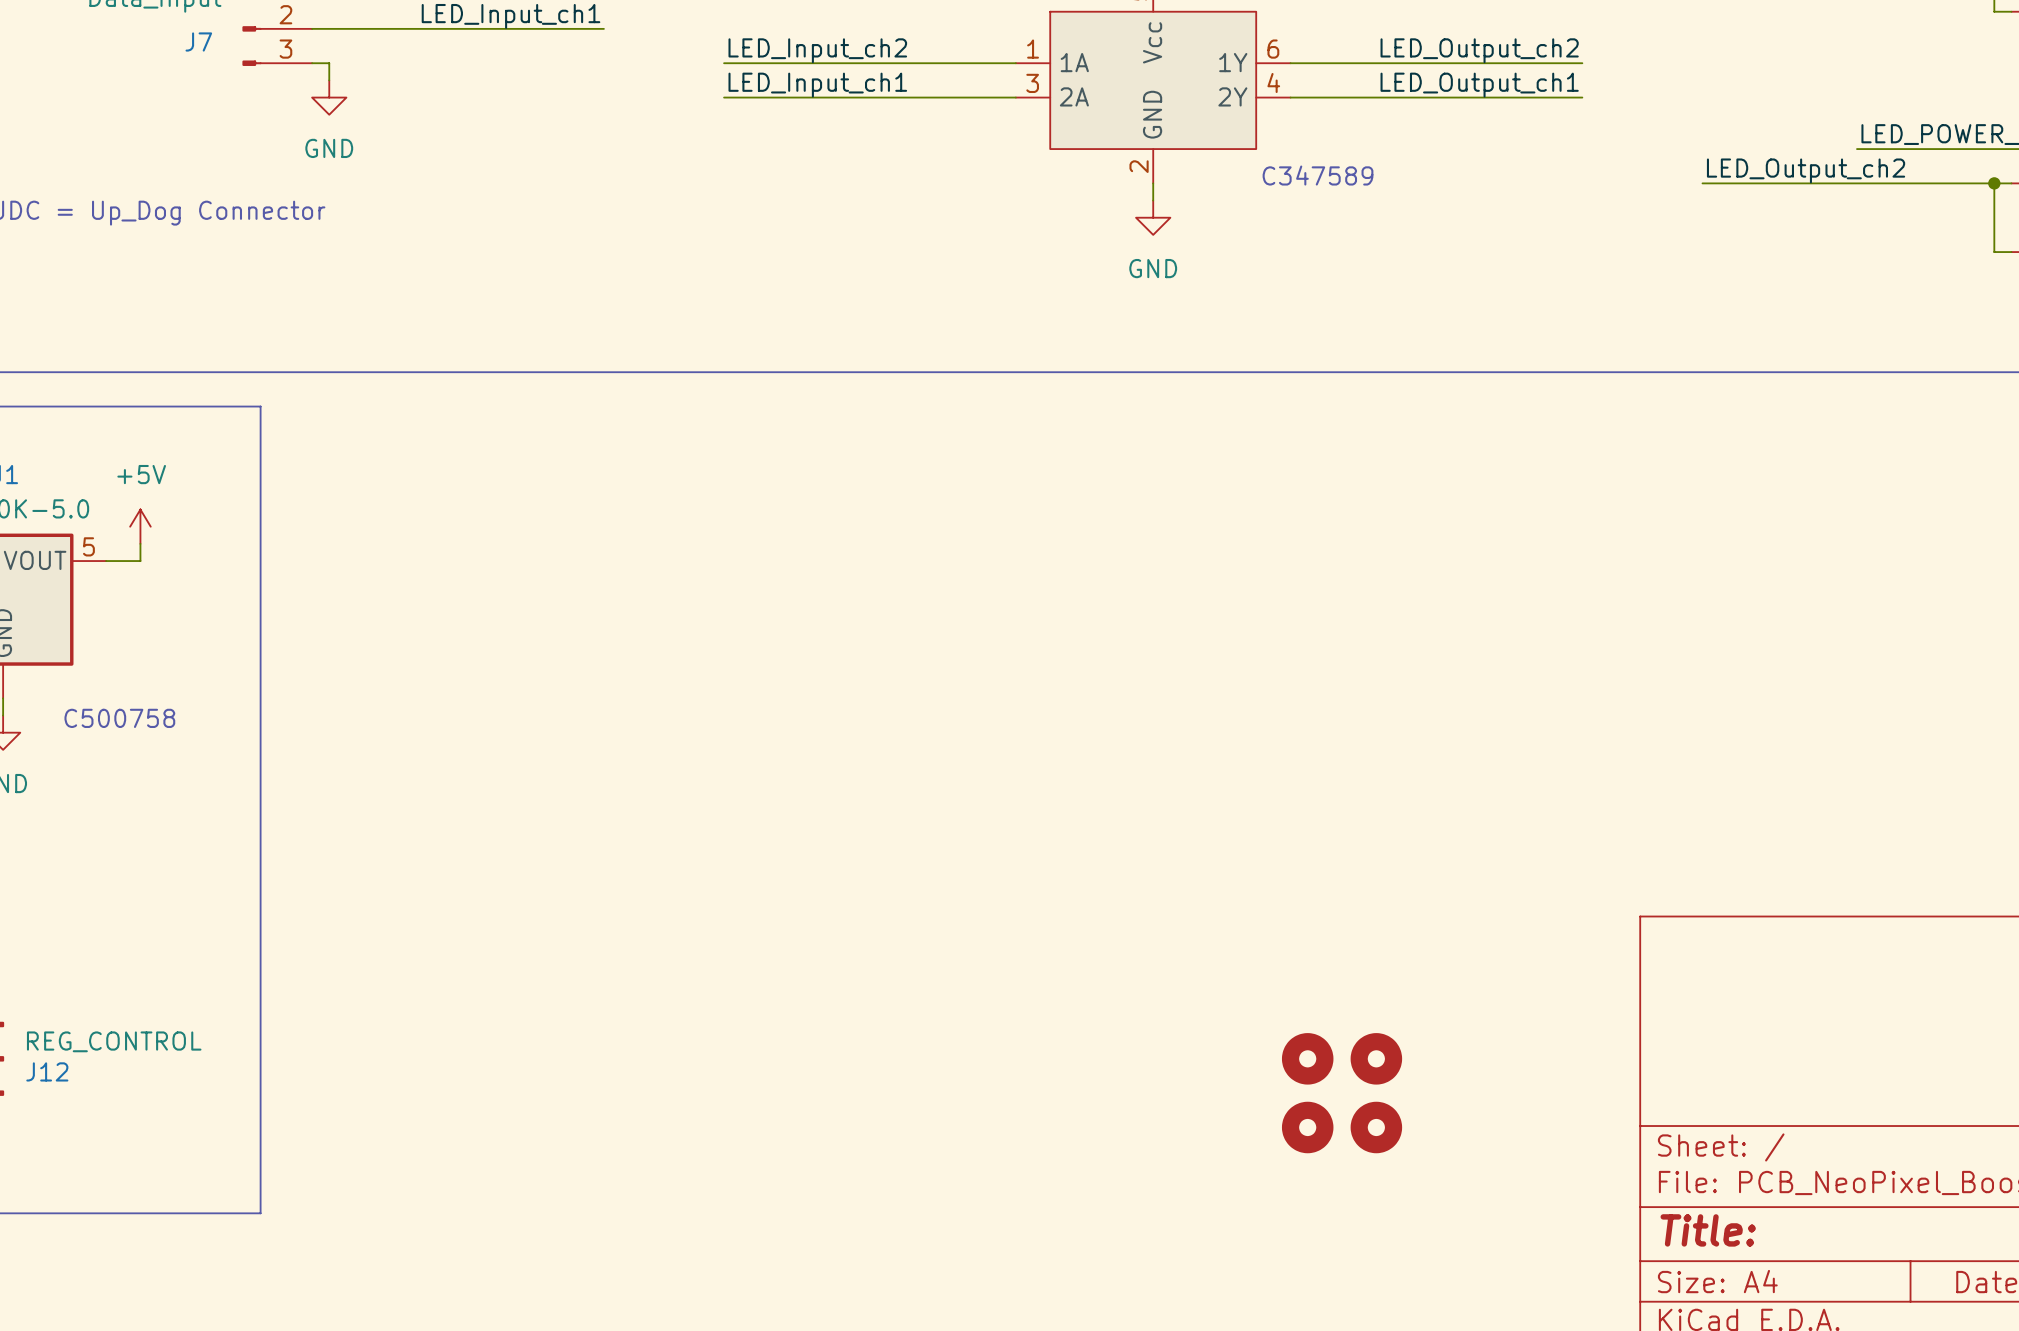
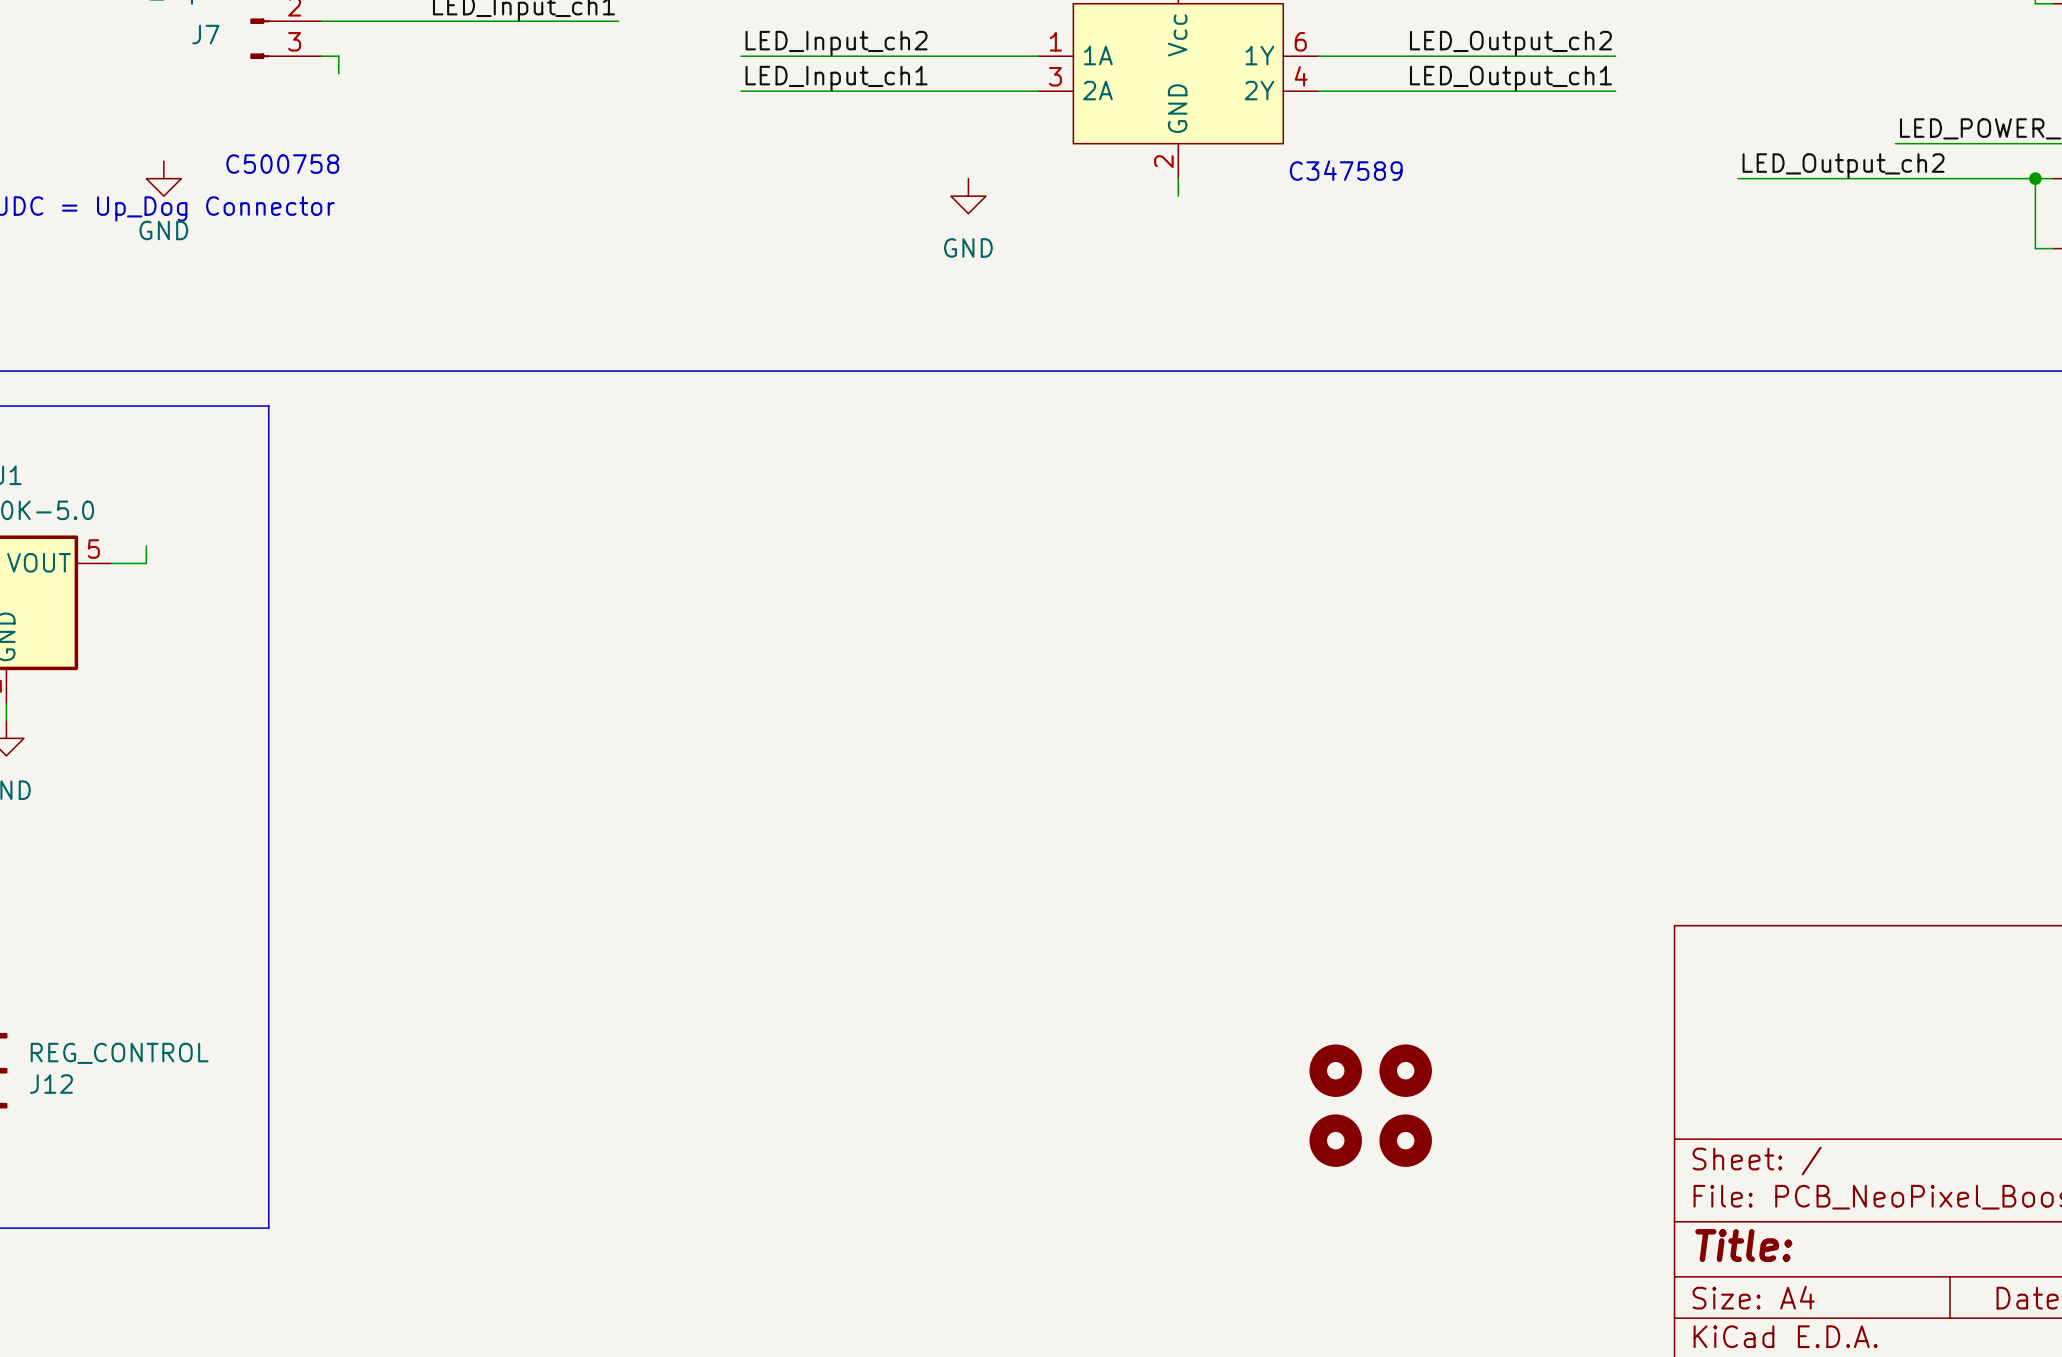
power symbol position: GND (329, 97) -> GND (163, 178)
text: none -> C500758 (282, 164)
power symbol position: GND (1153, 217) -> GND (968, 196)
power symbol: +5V (140, 526) -> none
text: C500758 (119, 718) -> none

